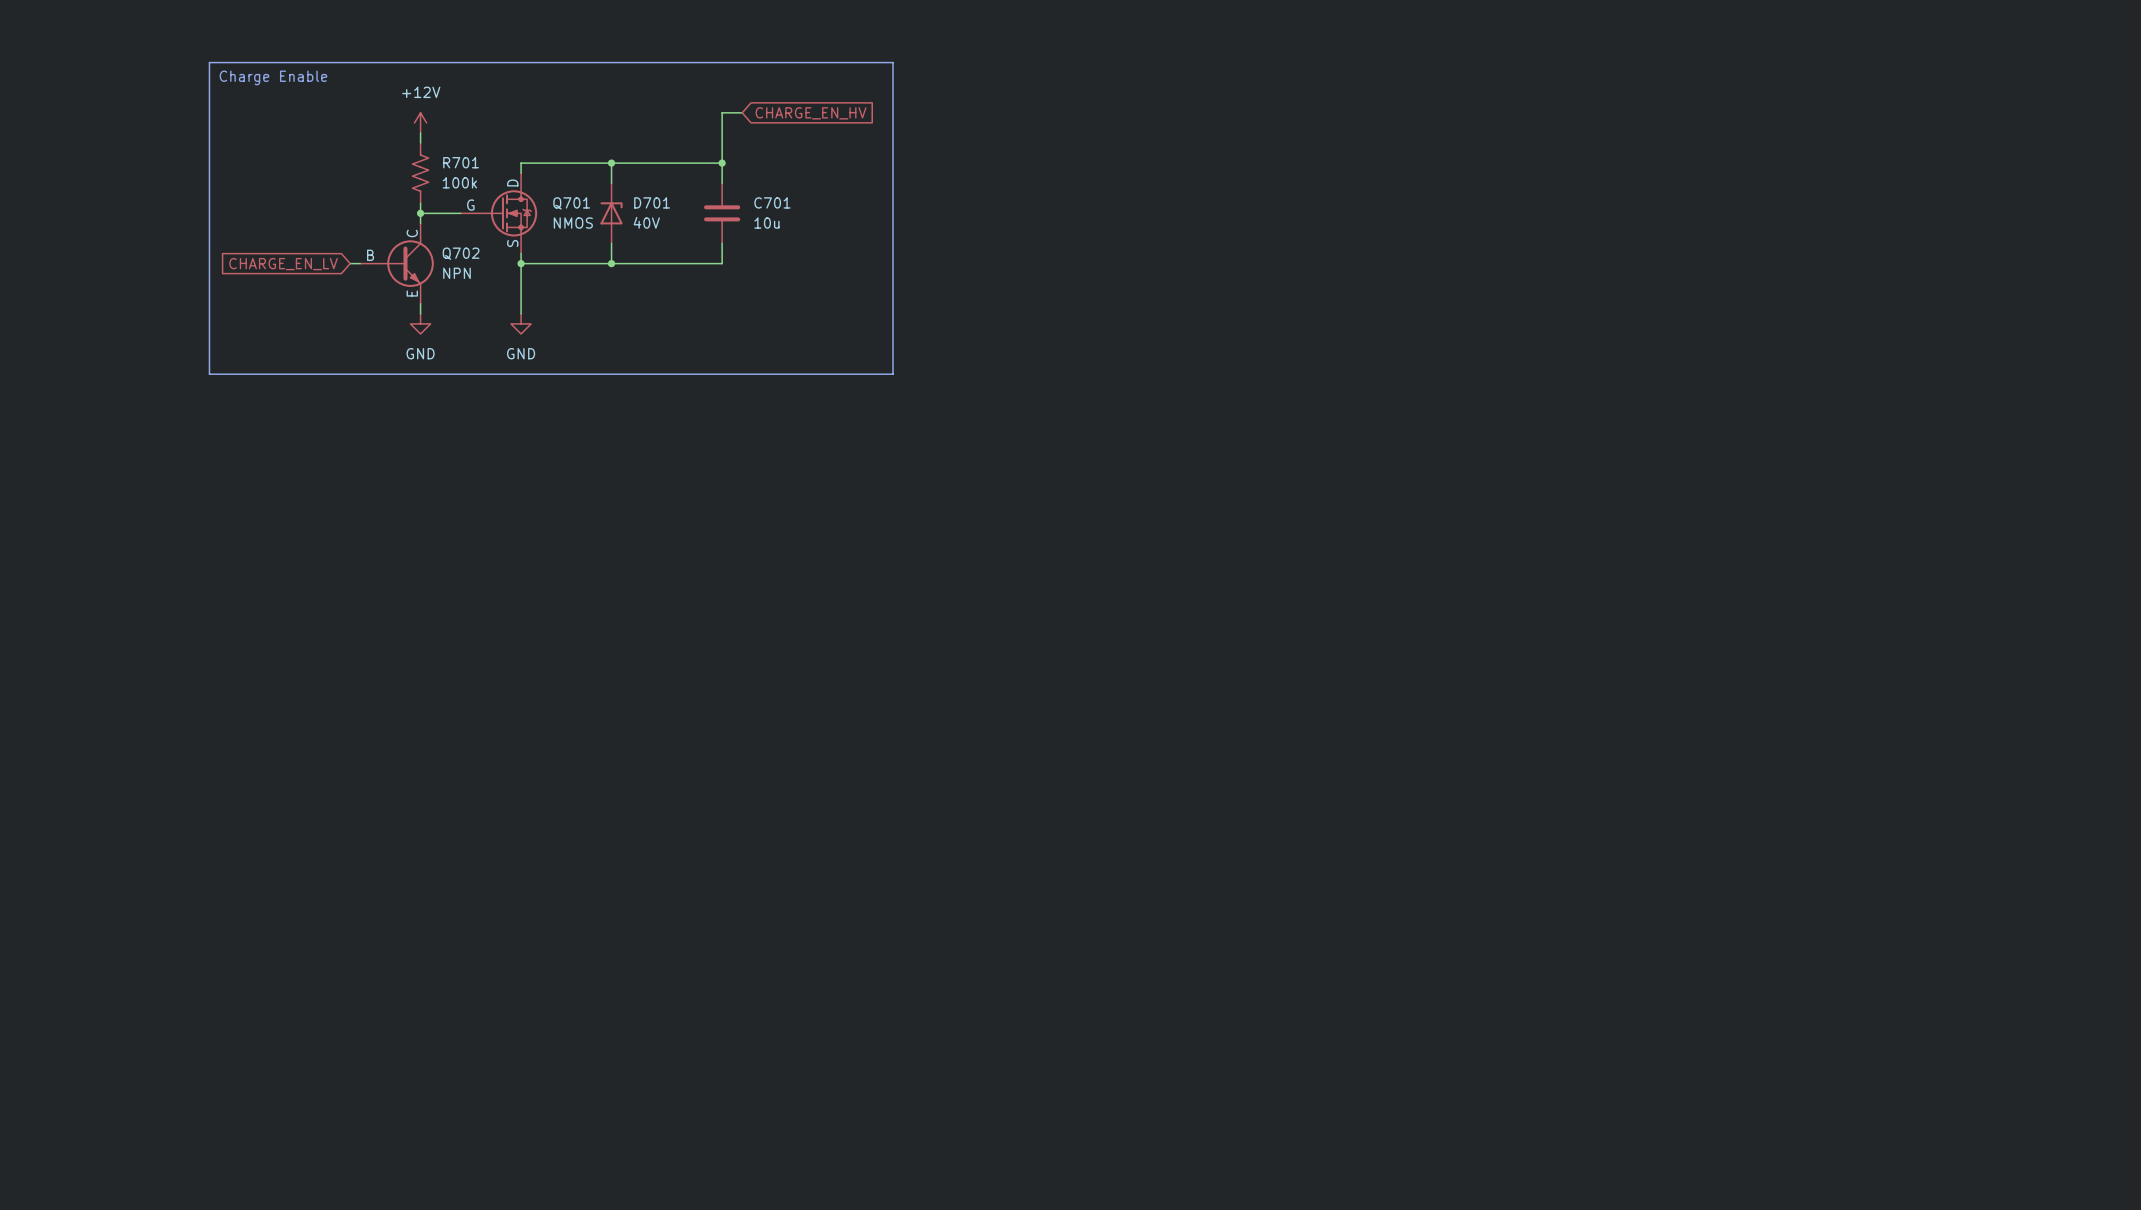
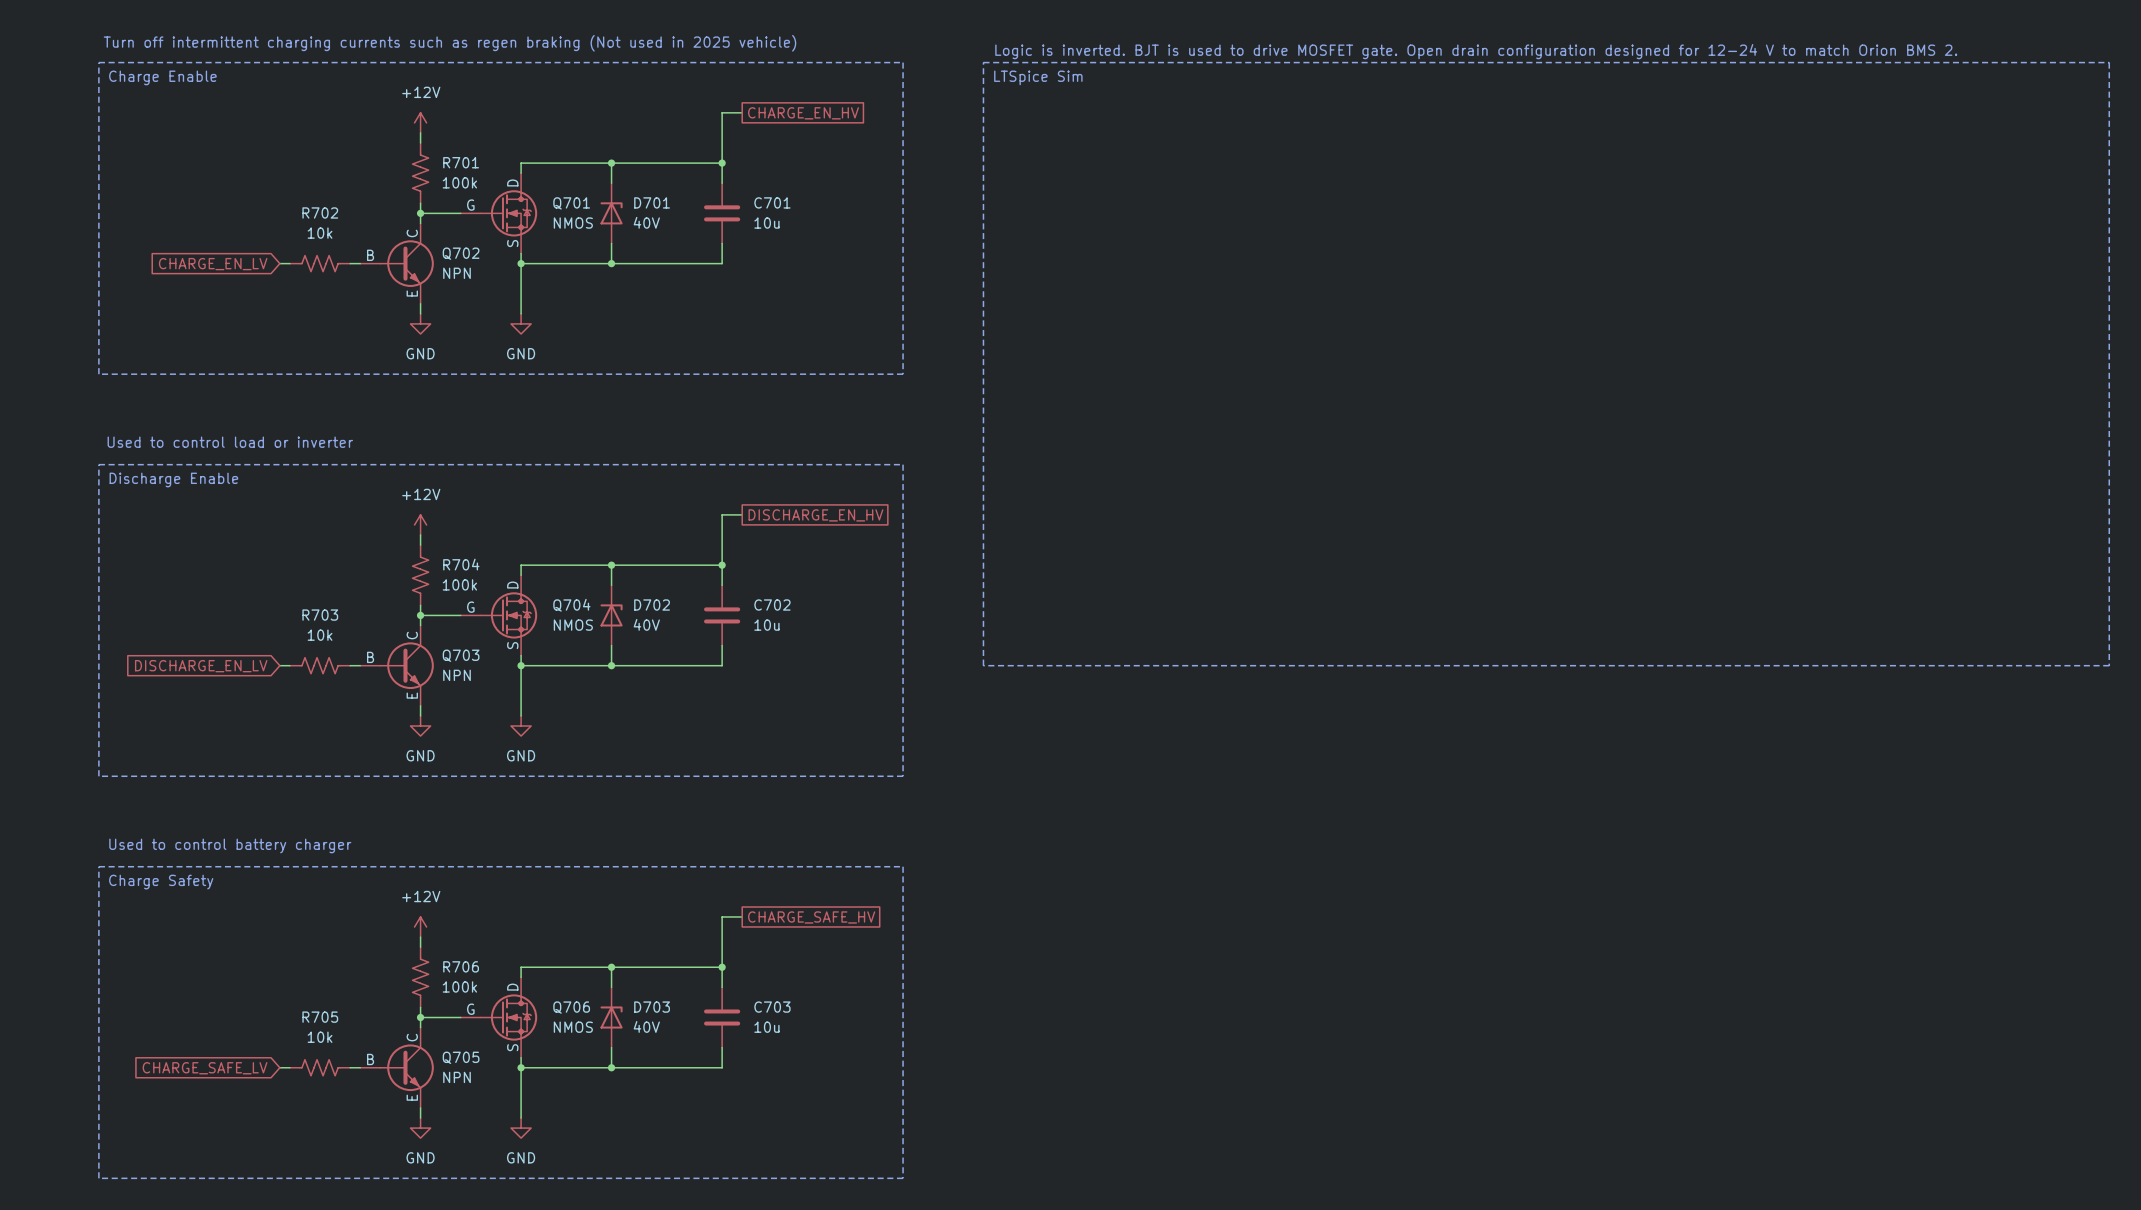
text: none -> Turn off intermittent charging currents such as regen braking (Not used in 2025 vehicle) (450, 43)
text: none -> Logic is inverted. BJT is used to drive MOSFET gate. Open drain configuration designed for 12-24 V to match Orion BMS 2. (1476, 51)
line: (209, 62) (893, 62) (893, 374) (209, 374) (209, 62) -> (98, 62) (98, 374) (903, 374) (903, 62) (98, 62)
line: none -> (983, 62) (2109, 62) (2109, 665) (983, 665) (983, 62)
text position: Charge Enable (273, 77) -> Charge Enable (162, 77)
text: none -> LTSpice Sim (1038, 77)
global label shape: input (811, 113) -> passive (803, 113)
wire: none -> (279, 263) (289, 263)
R702: none -> 10k (320, 263)
global label position: CHARGE_EN_LV (283, 264) -> CHARGE_EN_LV (213, 264)
text: none -> Used to control load or inverter (230, 442)
line: none -> (98, 464) (98, 776) (903, 776) (903, 464) (98, 464)
text: none -> Discharge Enable (173, 479)
wire: none -> (742, 514) (722, 514) (722, 585)
global label: none -> DISCHARGE_EN_HV (815, 515)
power symbol: none -> +12V (420, 524)
wire: none -> (420, 535) (420, 545)
wire: none -> (611, 565) (611, 585)
junction: none -> (611, 565)
wire: none -> (722, 565) (521, 565) (521, 575)
junction: none -> (722, 565)
R704: none -> 100k (420, 575)
wire: none -> (420, 605) (420, 625)
wire: none -> (420, 615) (460, 615)
junction: none -> (420, 615)
Q704: none -> NMOS (498, 615)
D702: none -> 40V (611, 615)
C702: none -> 10u (722, 615)
wire: none -> (611, 645) (611, 665)
wire: none -> (722, 645) (722, 665) (521, 665)
wire: none -> (521, 655) (521, 715)
wire: none -> (279, 665) (289, 665)
R703: none -> 10k (320, 665)
wire: none -> (350, 665) (360, 665)
Q703: none -> NPN (397, 665)
junction: none -> (521, 665)
junction: none -> (611, 665)
global label: none -> DISCHARGE_EN_LV (201, 666)
wire: none -> (420, 705) (420, 715)
power symbol: none -> GND (420, 726)
power symbol: none -> GND (521, 726)
text: none -> Used to control battery charger (230, 845)
line: none -> (98, 866) (903, 866) (903, 1178) (98, 1178) (98, 866)
text: none -> Charge Safety (161, 882)
wire: none -> (742, 916) (722, 916) (722, 987)
global label: none -> CHARGE_SAFE_HV (811, 917)
power symbol: none -> +12V (420, 927)
wire: none -> (420, 937) (420, 947)
wire: none -> (611, 967) (611, 987)
junction: none -> (611, 967)
wire: none -> (722, 967) (521, 967) (521, 977)
junction: none -> (722, 967)
R706: none -> 100k (420, 977)
wire: none -> (420, 1007) (420, 1027)
wire: none -> (420, 1017) (460, 1017)
junction: none -> (420, 1017)
Q706: none -> NMOS (498, 1017)
D703: none -> 40V (611, 1017)
C703: none -> 10u (722, 1017)
wire: none -> (611, 1047) (611, 1067)
wire: none -> (722, 1047) (722, 1067) (521, 1067)
wire: none -> (521, 1057) (521, 1118)
wire: none -> (279, 1067) (289, 1067)
R705: none -> 10k (320, 1067)
wire: none -> (350, 1067) (360, 1067)
Q705: none -> NPN (397, 1067)
junction: none -> (521, 1067)
junction: none -> (611, 1067)
global label: none -> CHARGE_SAFE_LV (205, 1068)
wire: none -> (420, 1107) (420, 1118)
power symbol: none -> GND (420, 1128)
power symbol: none -> GND (521, 1128)

